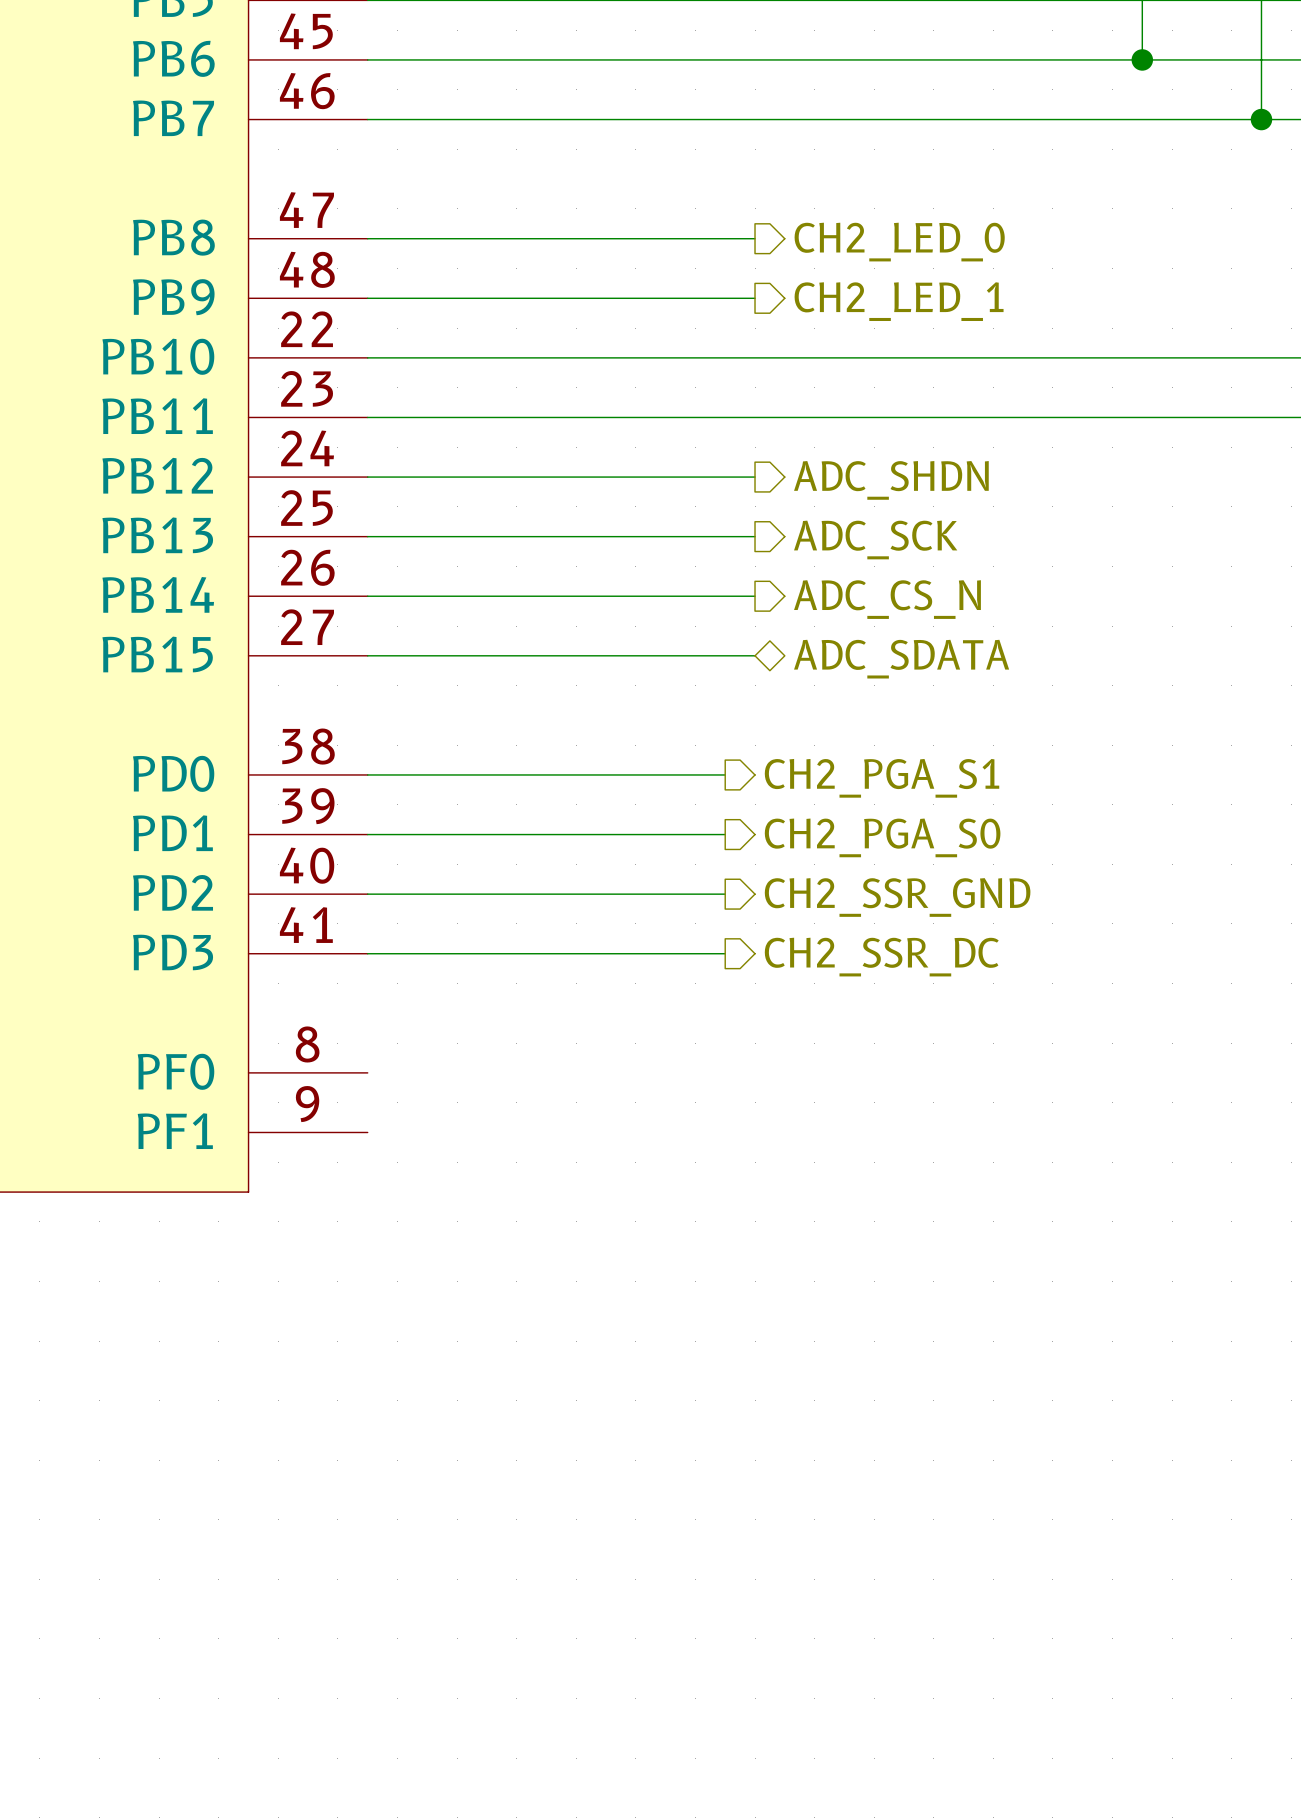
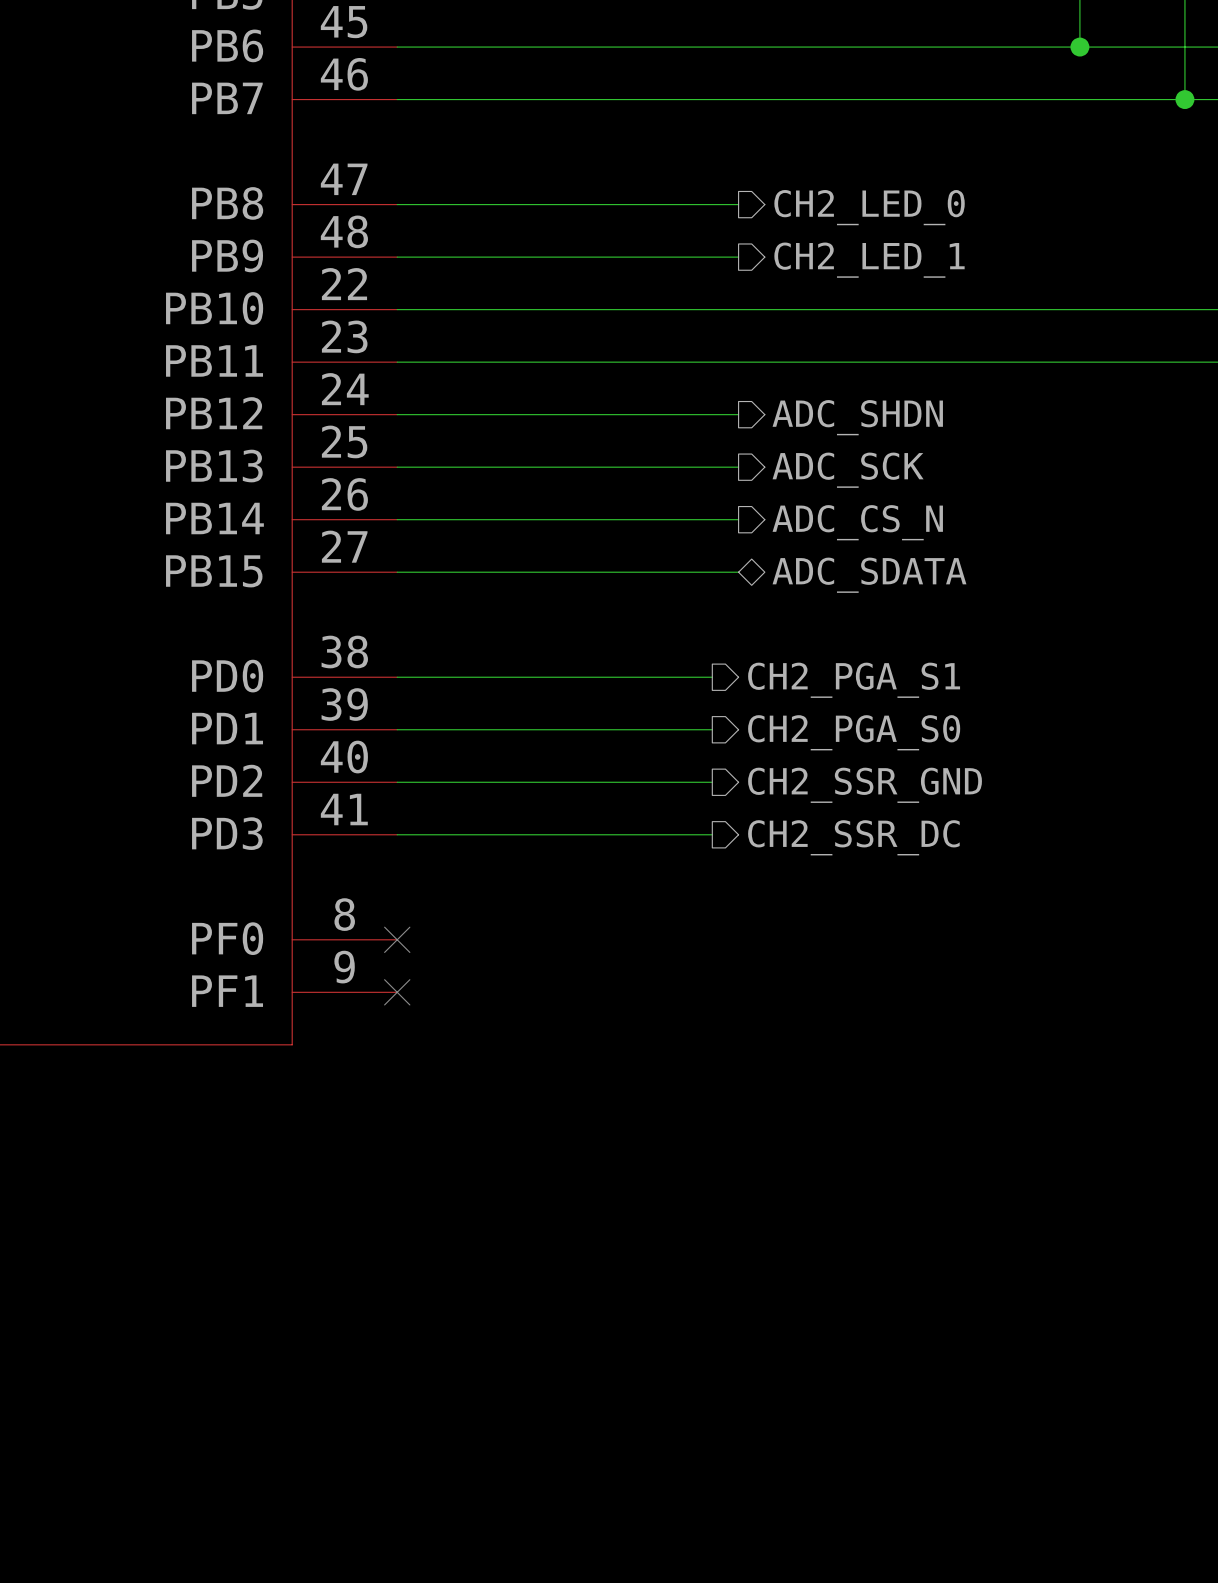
no-connect mark: none -> (397, 939)
no-connect mark: none -> (397, 992)

